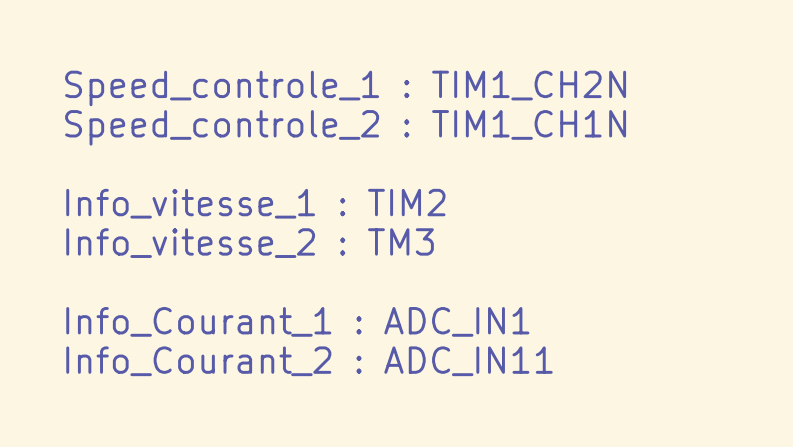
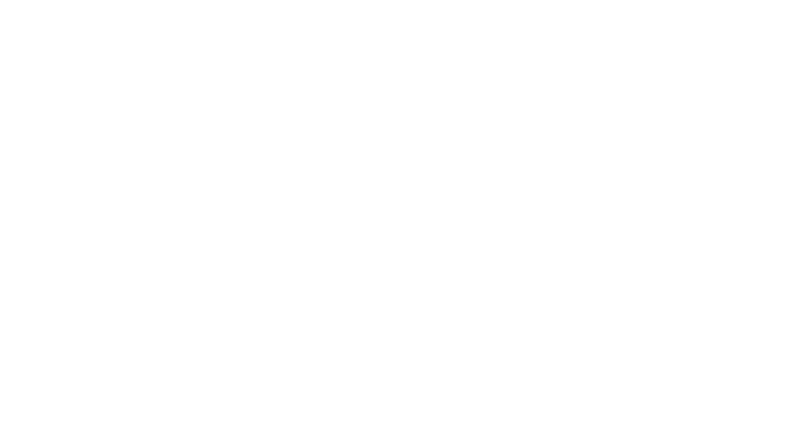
text: Speed_controle_1 : TIM1_CH2N (345, 88) -> none
text: Speed_controle_2 : TIM1_CH1N (345, 127) -> none
text: Info_vitesse_1 : TIM2 (255, 203) -> none
text: Info_vitesse_2 : TM3 (250, 243) -> none
text: Info_Courant_1 : ADC_IN1 (297, 321) -> none
text: Info_Courant_2 : ADC_IN11 (309, 361) -> none

